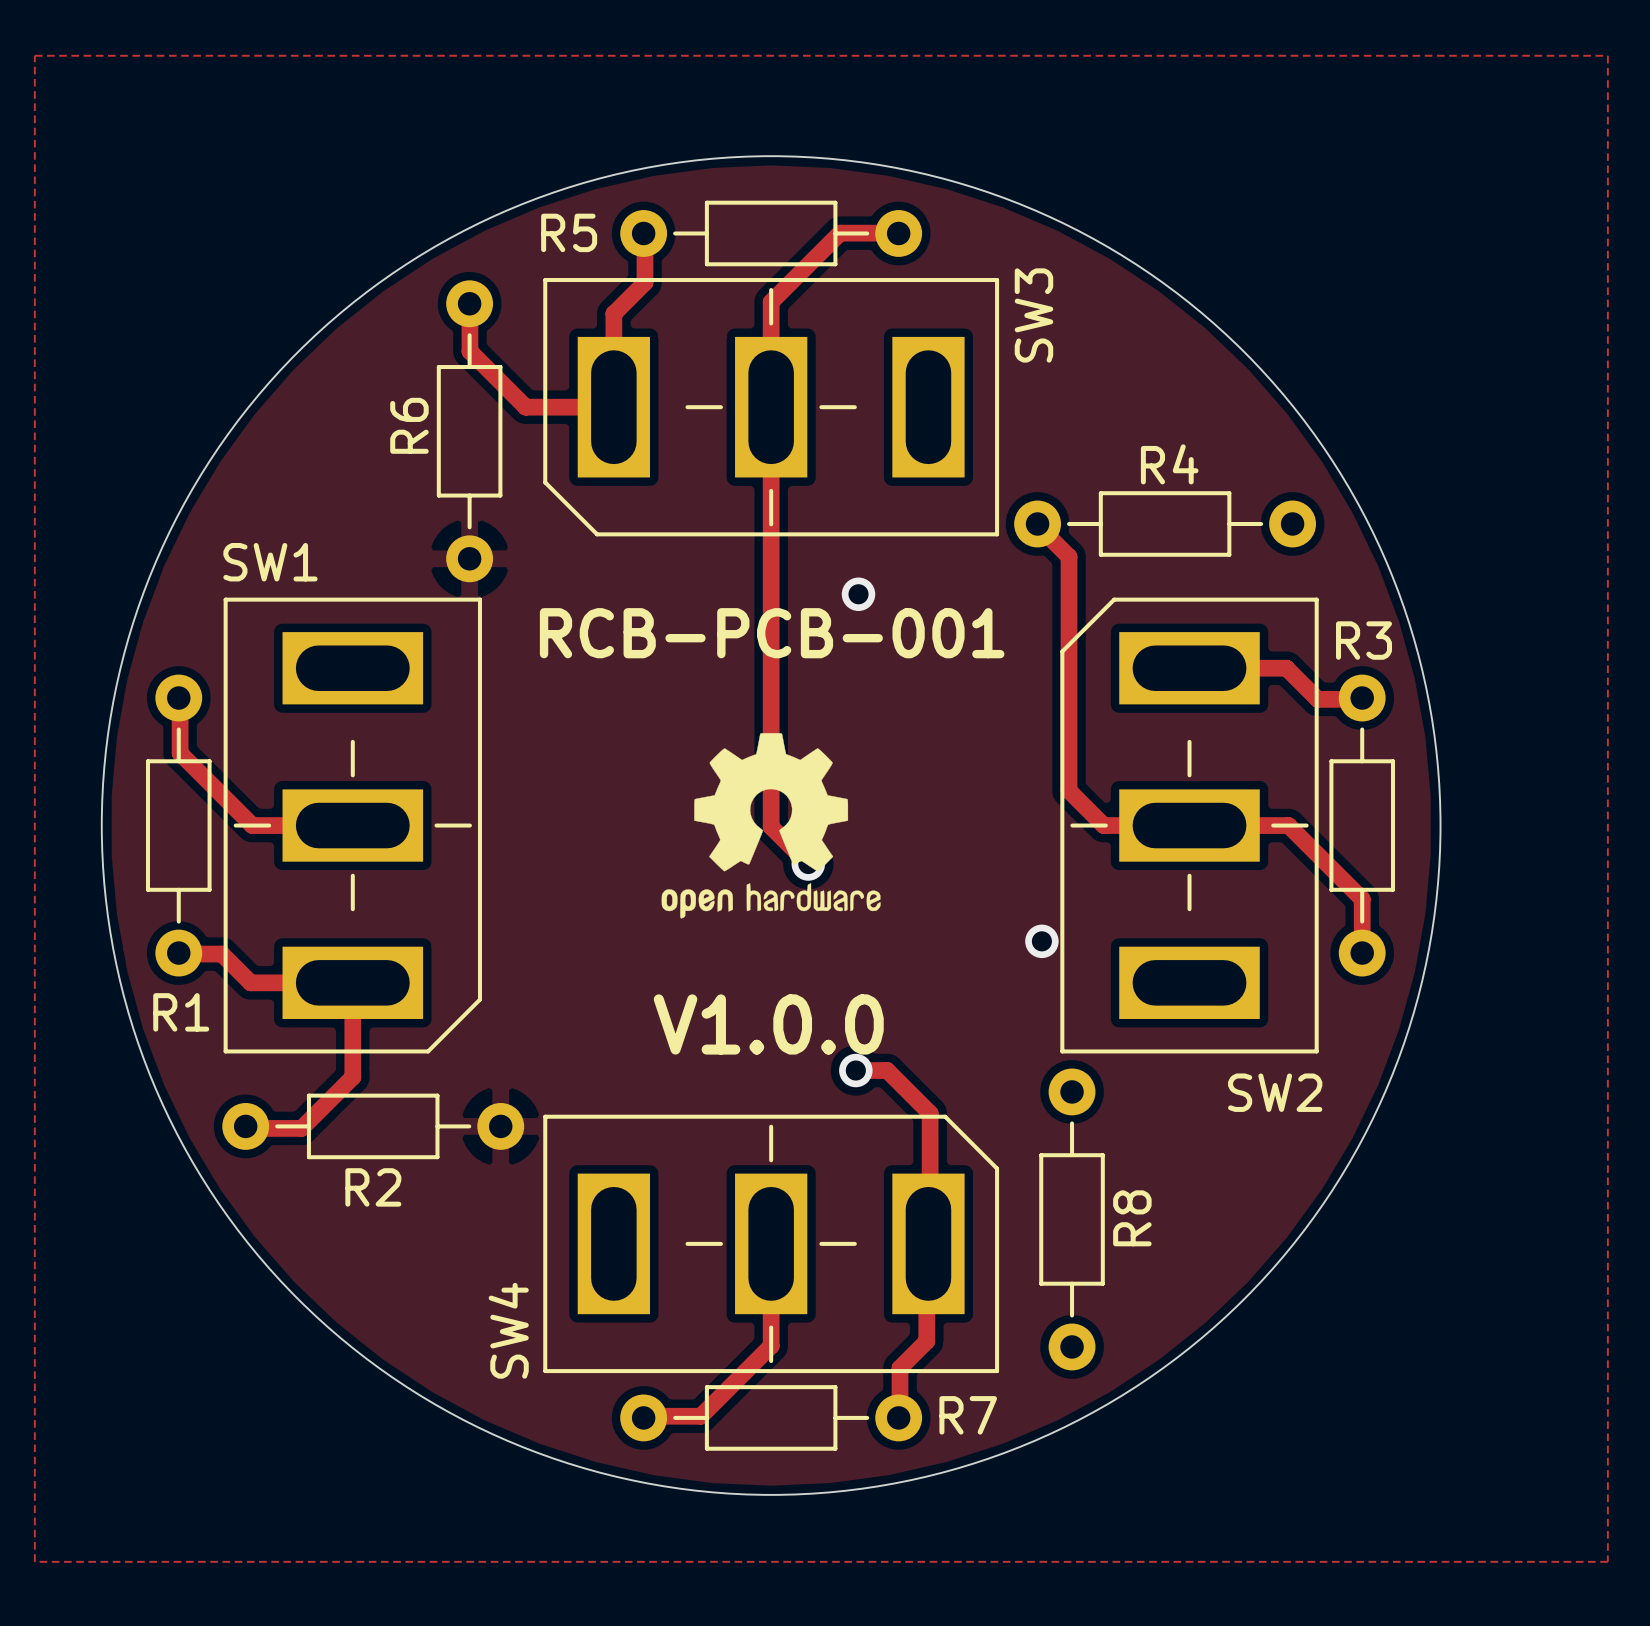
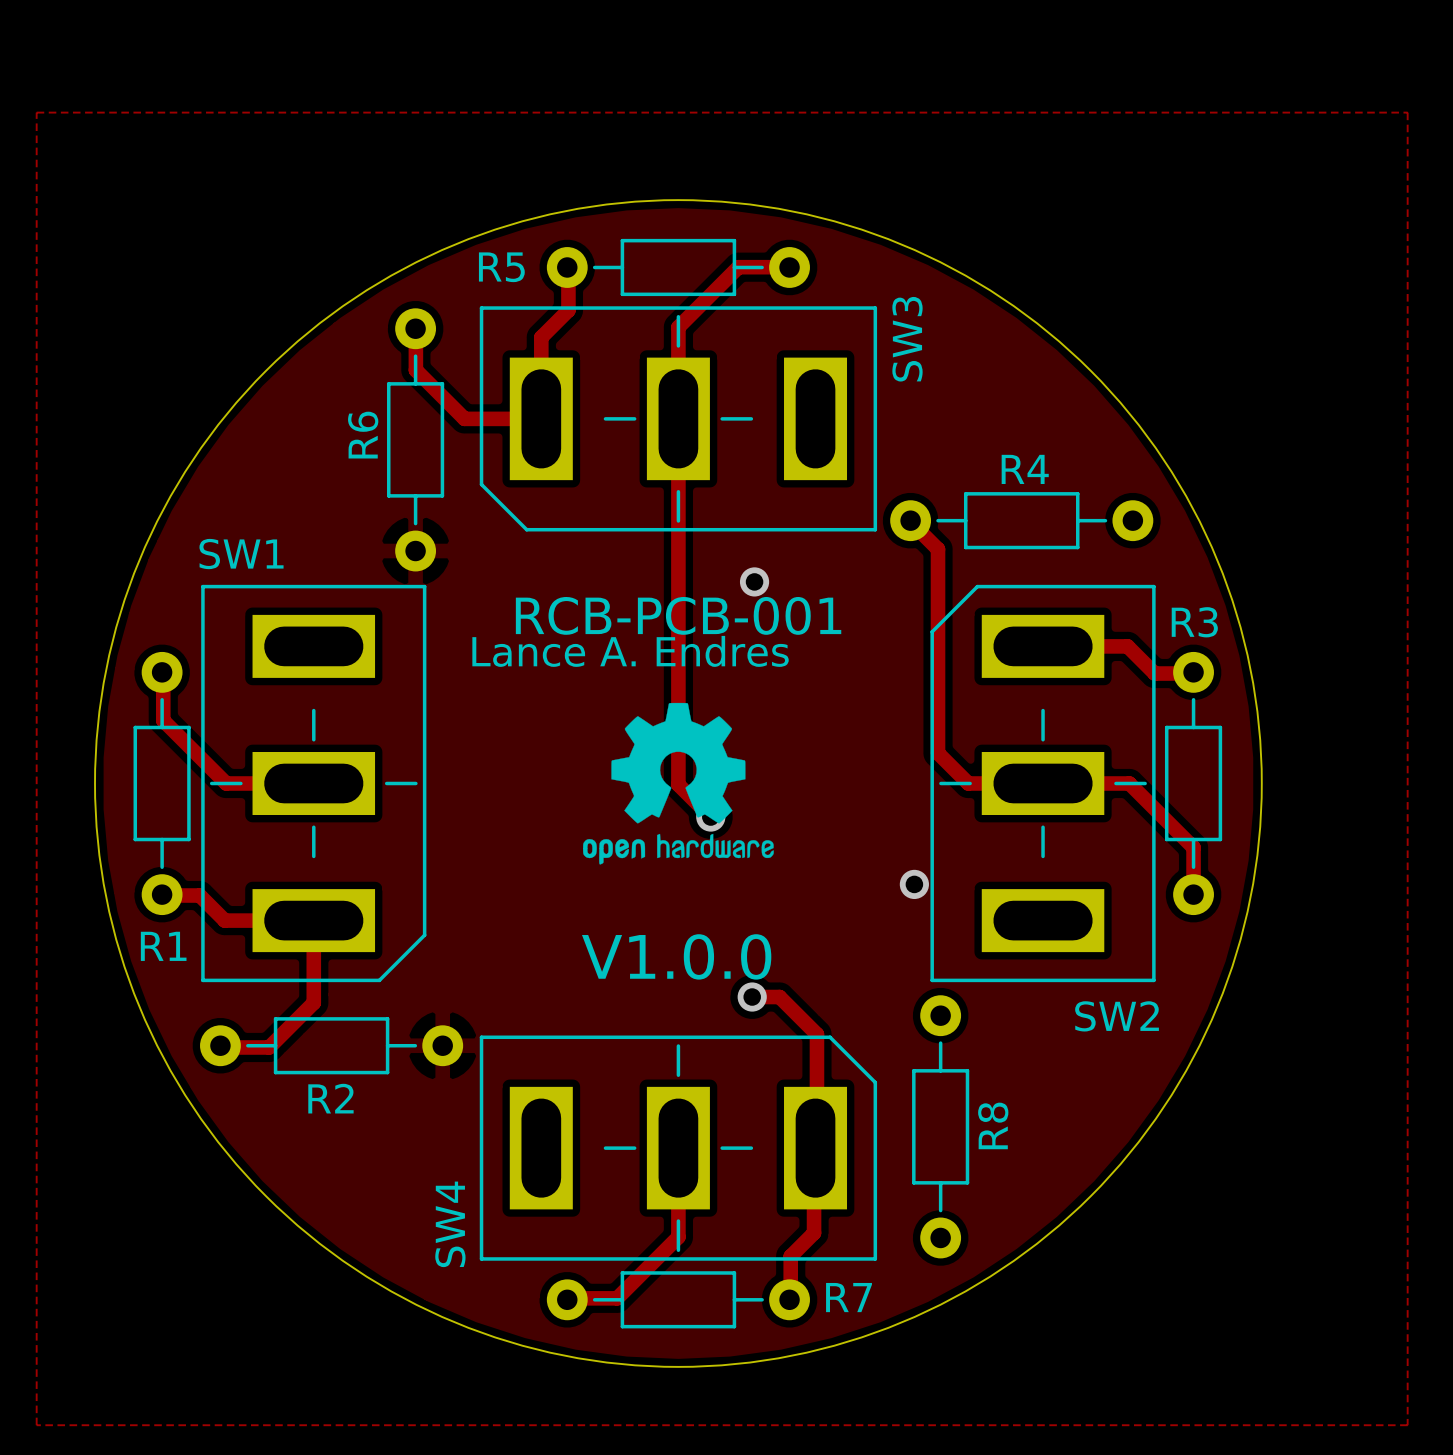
text: none -> Lance A. Endres (630, 651)

